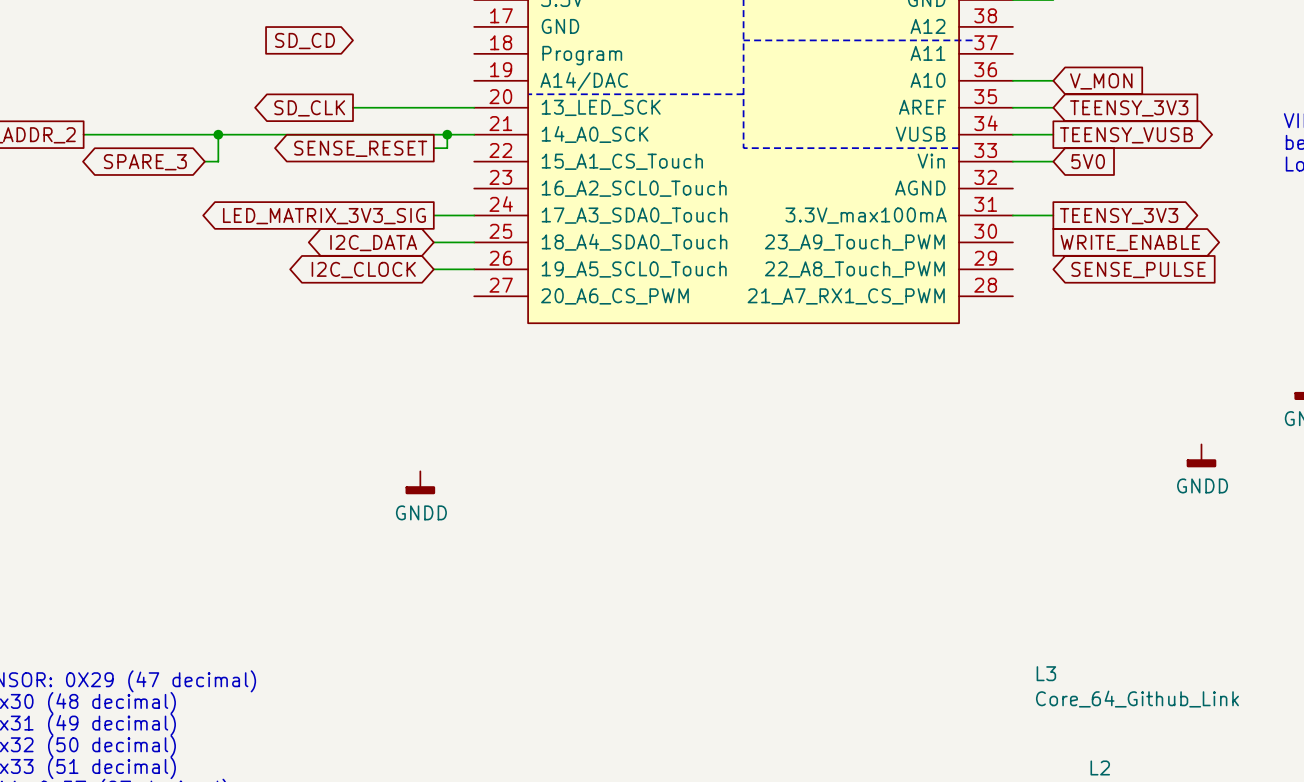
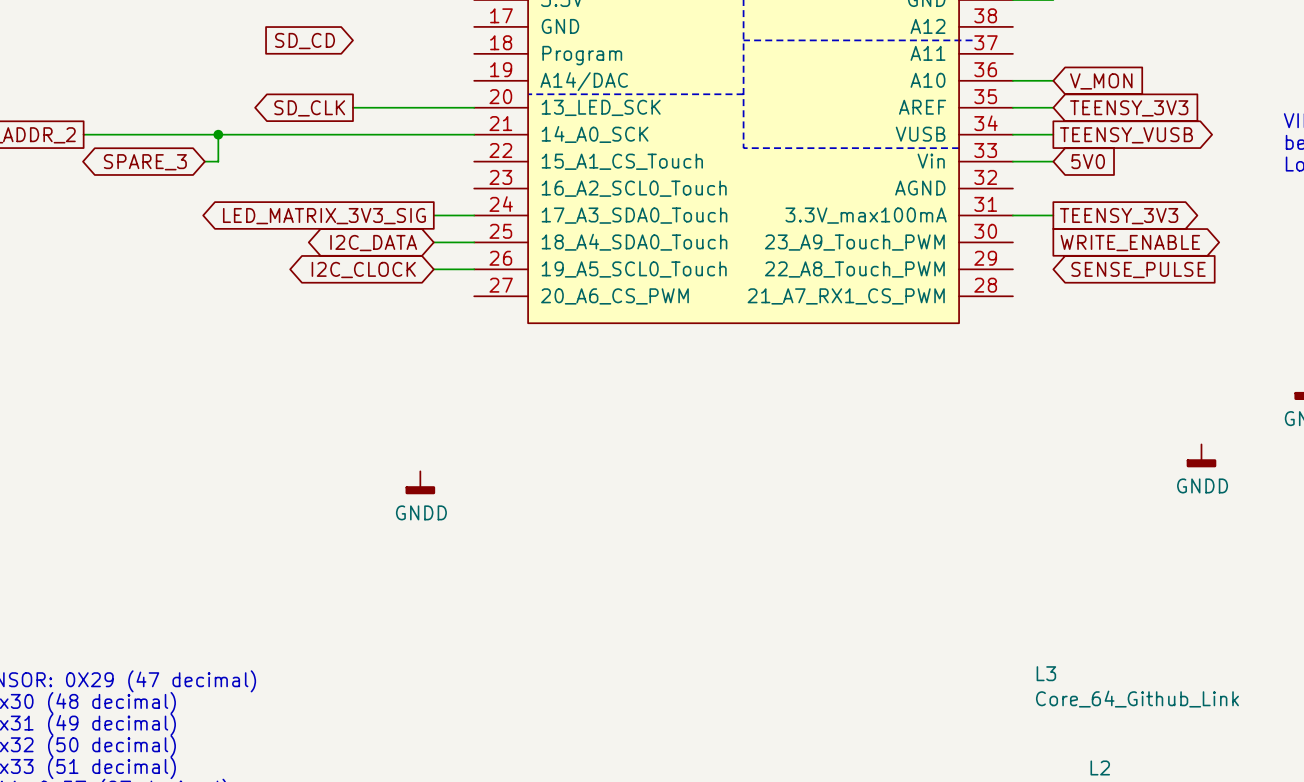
wire: (447, 134) (447, 148) (433, 148) -> none
junction: (447, 134) -> none
global label: SENSE_RESET (360, 148) -> none

